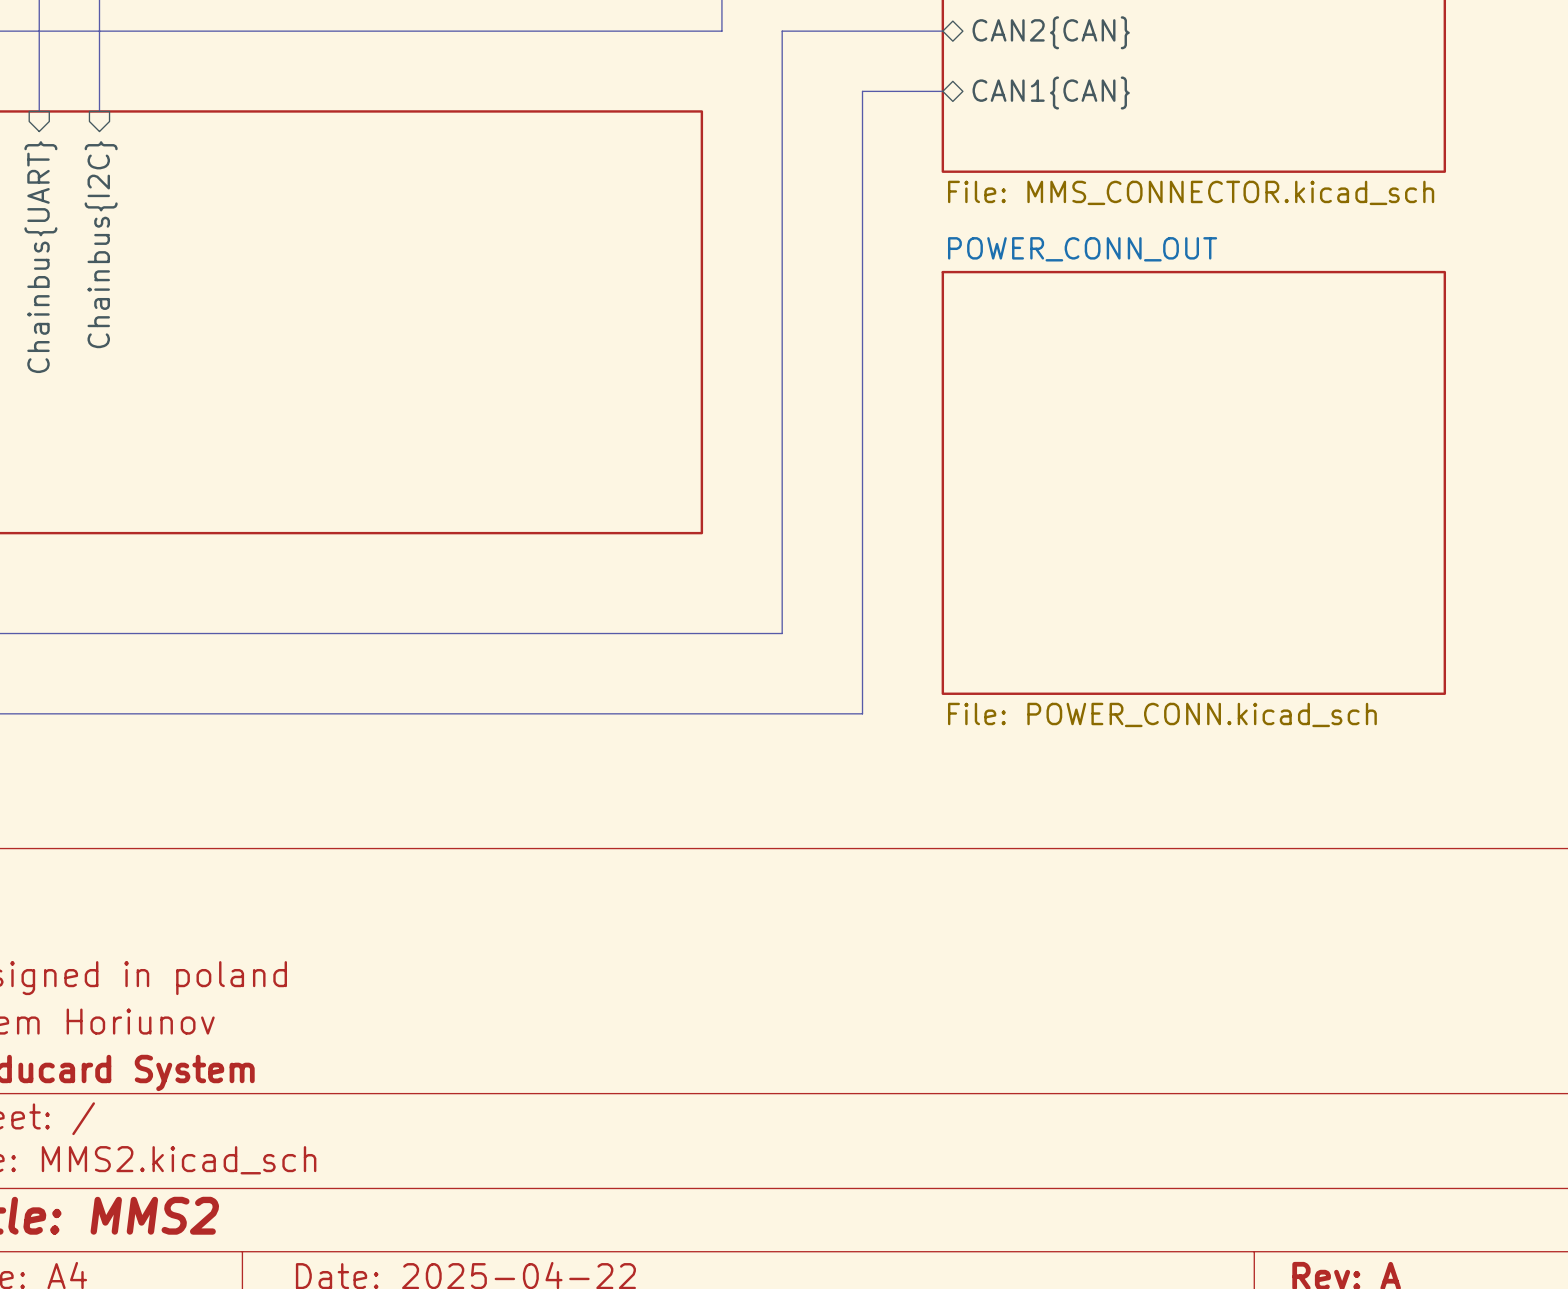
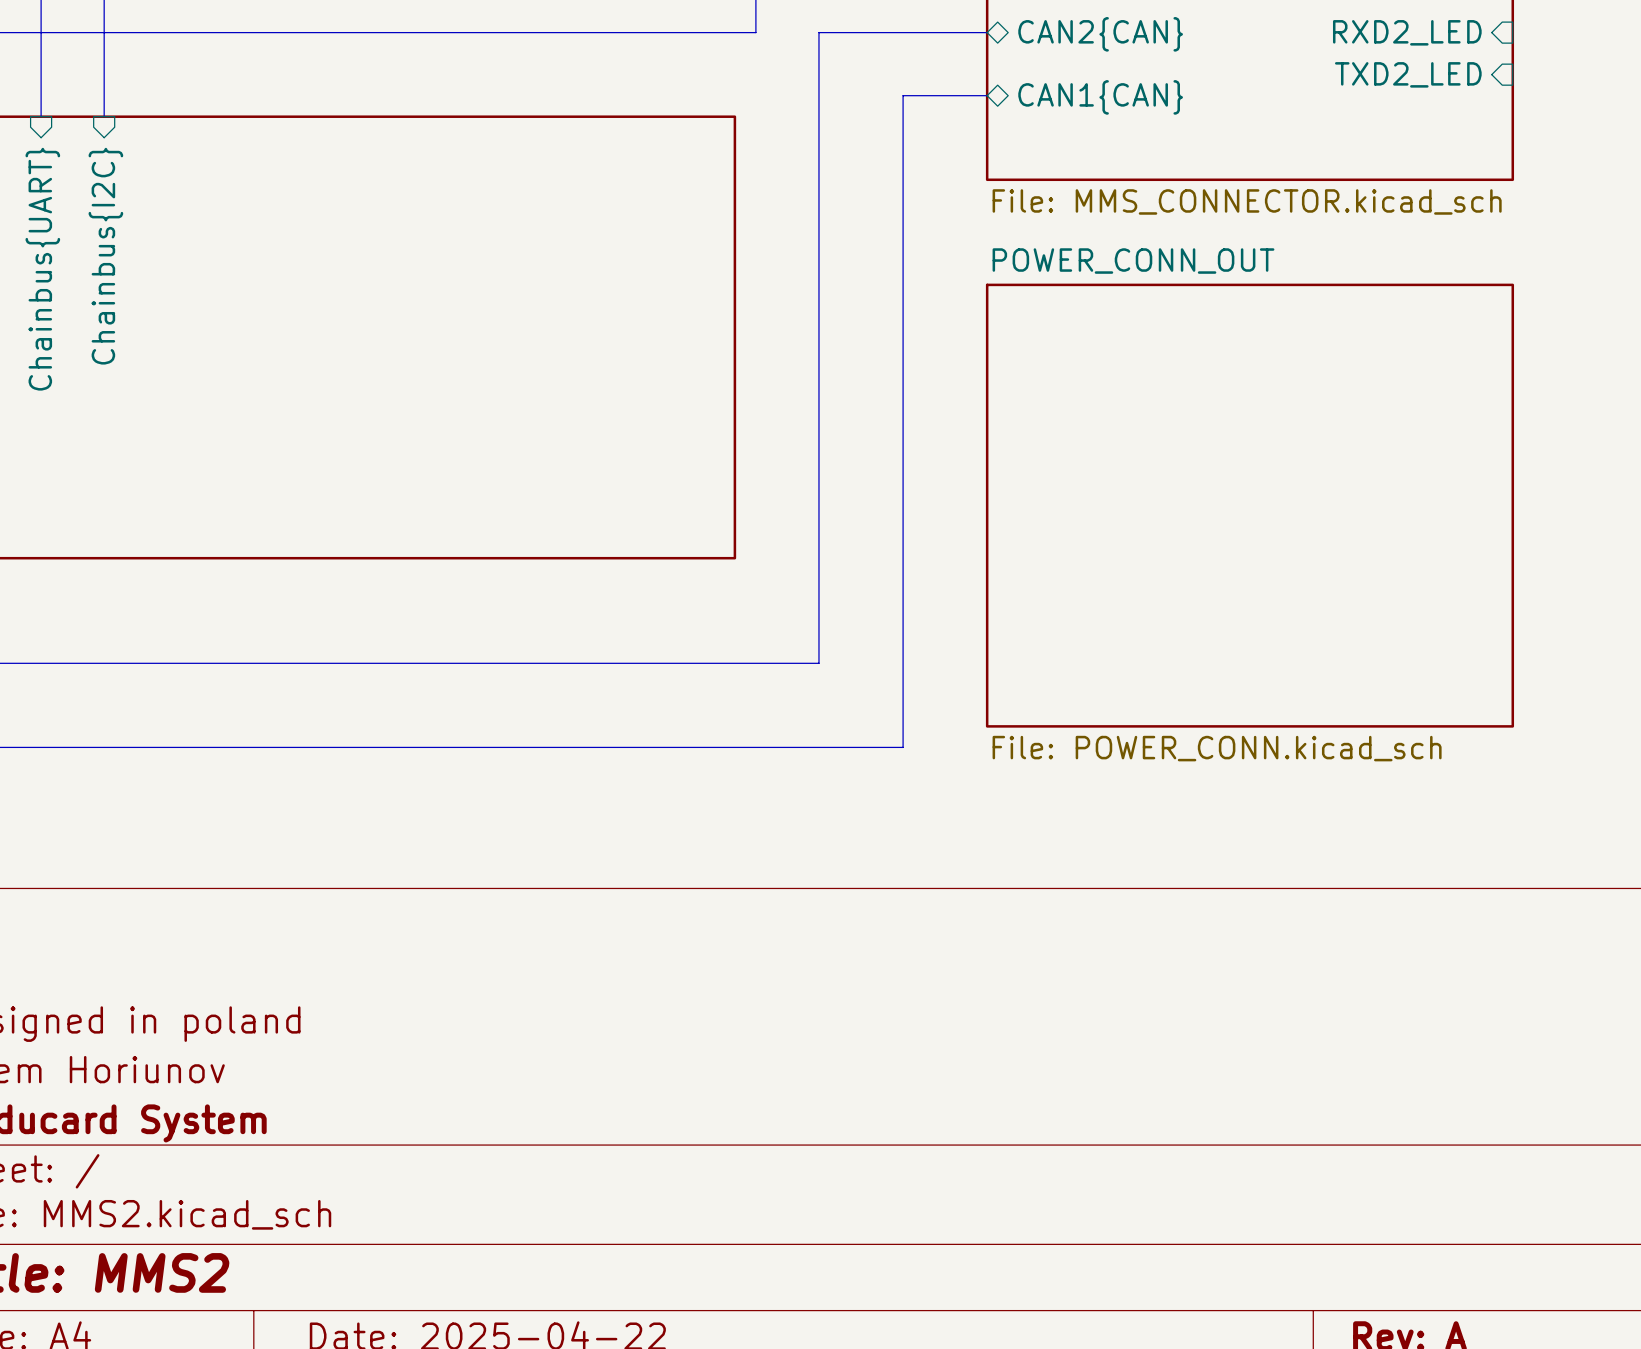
sheet pin: none -> RXD2_LED (1407, 32)
sheet pin: none -> TXD2_LED (1408, 74)

